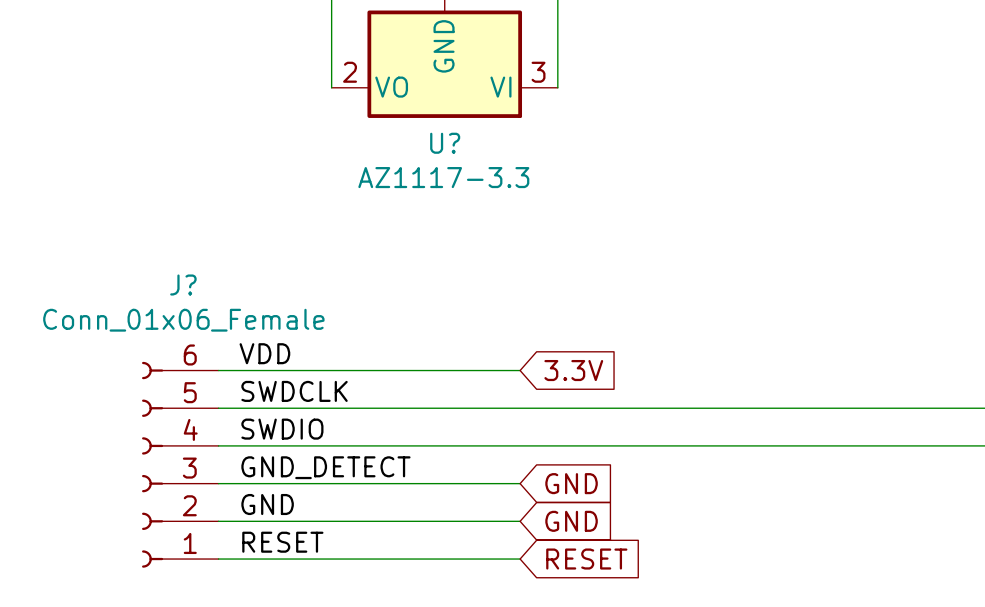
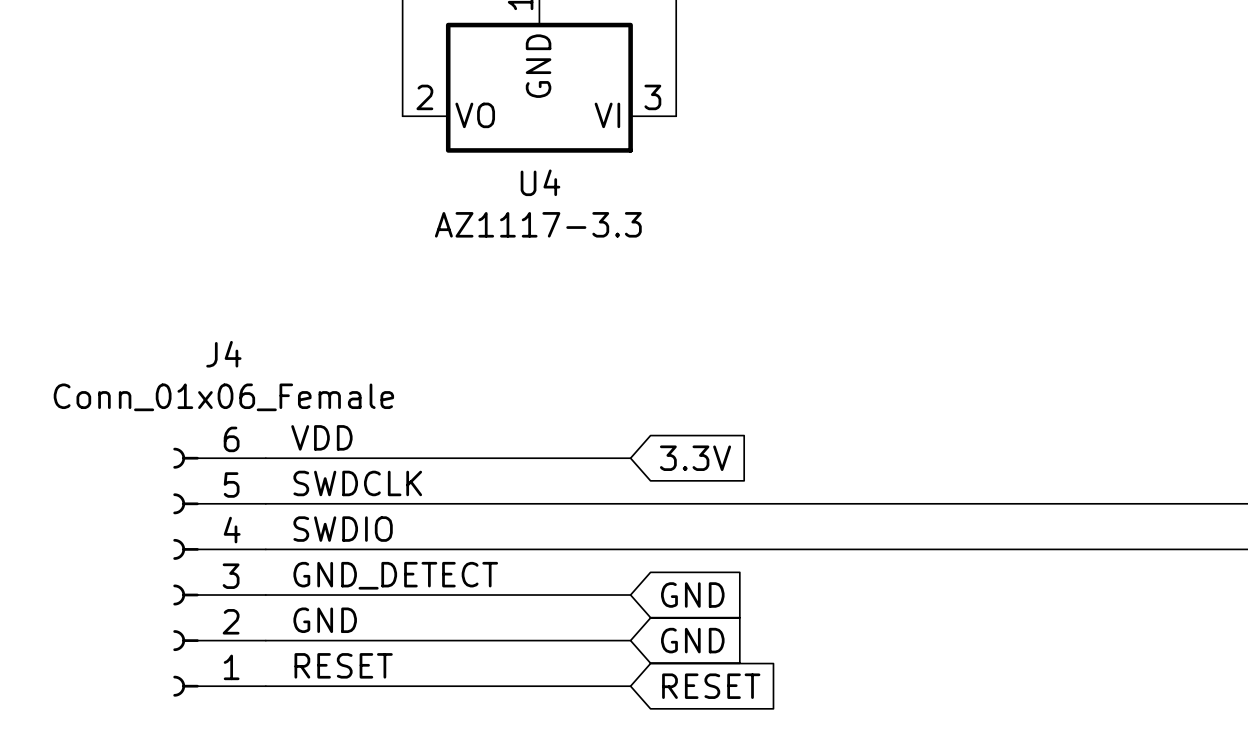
U? name: U? (445, 143) -> U4 (540, 182)
J? name: J? (183, 285) -> J4 (223, 354)

